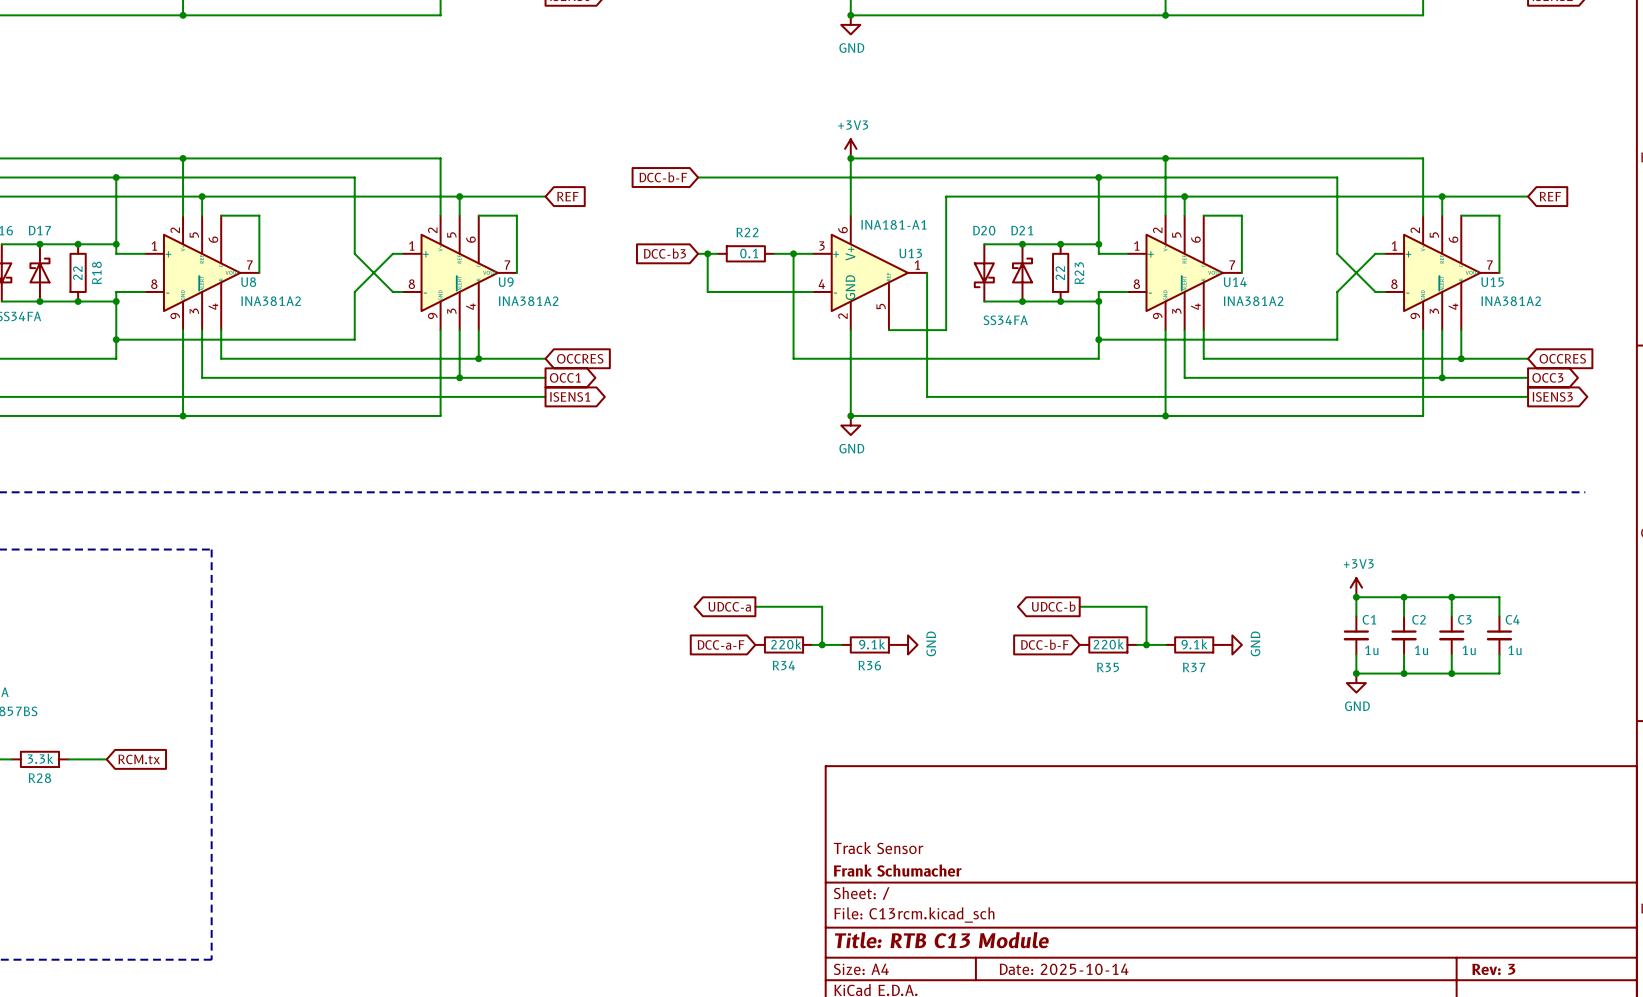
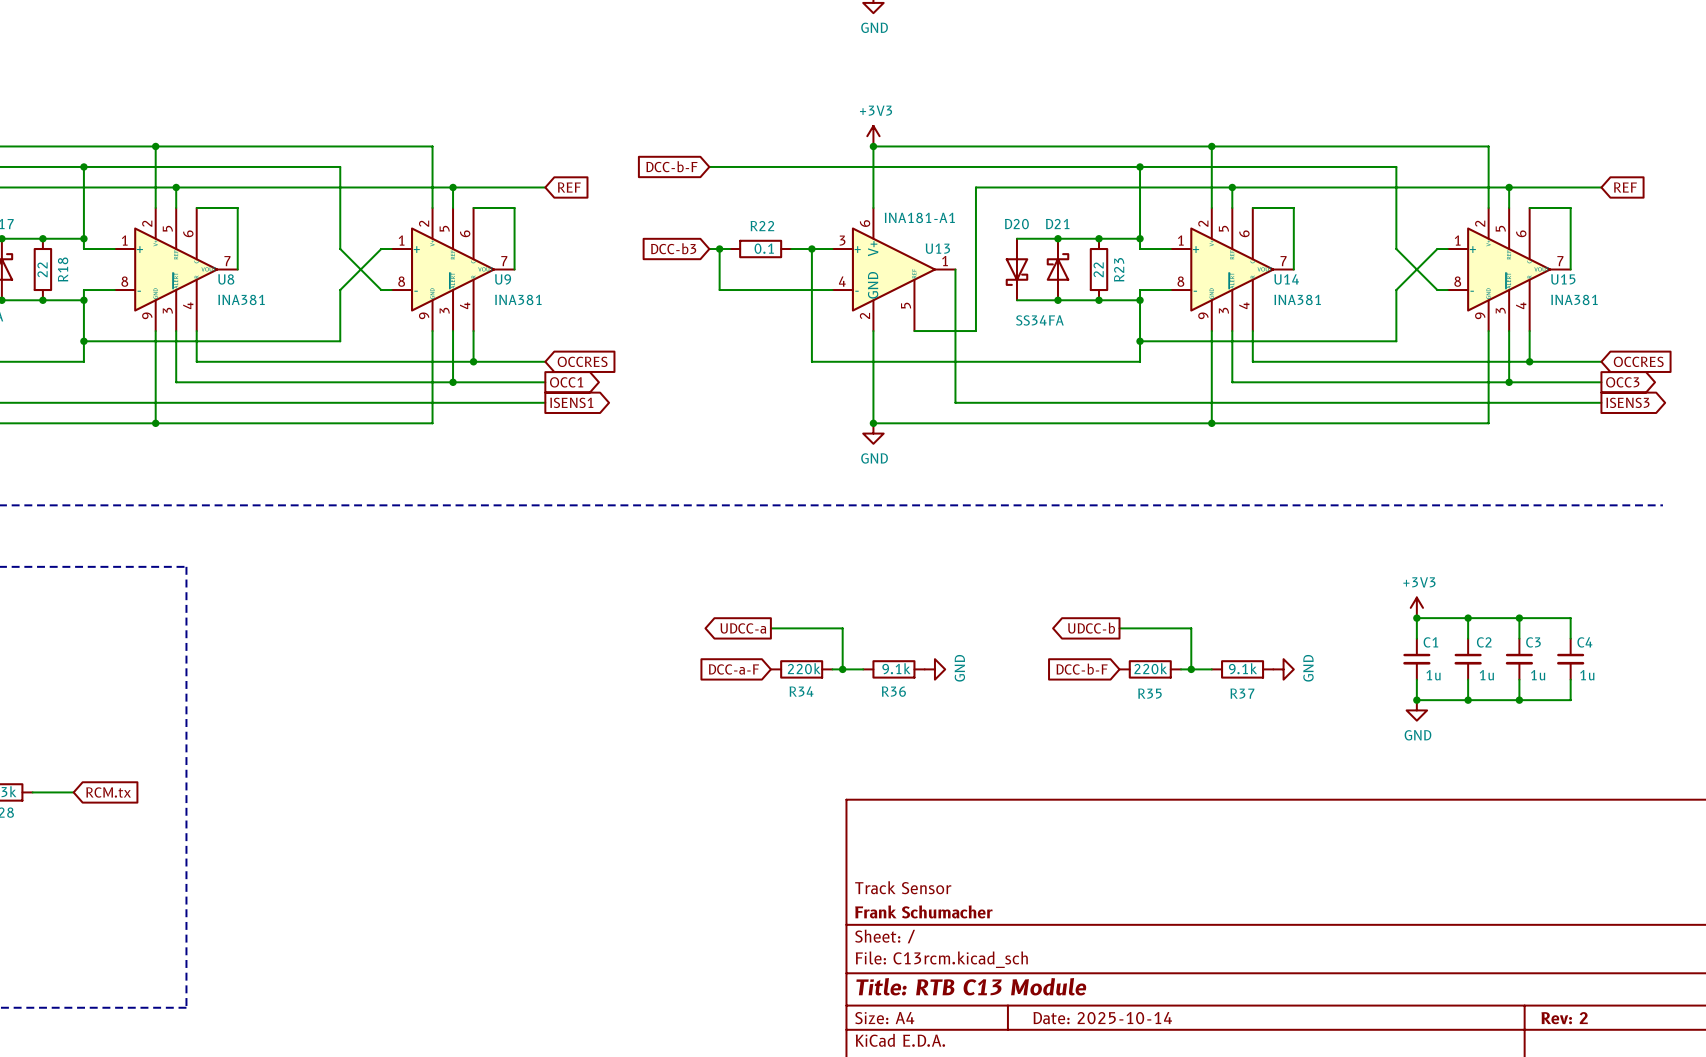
U8 value: INA381A2 (271, 301) -> INA381 (241, 299)
U9 value: INA381A2 (528, 301) -> INA381 (518, 299)
U14 value: INA381A2 (1253, 301) -> INA381 (1297, 299)
U15 value: INA381A2 (1511, 301) -> INA381 (1574, 299)
title block: Rev: 3 (1493, 969) -> Rev: 2 (1564, 1018)

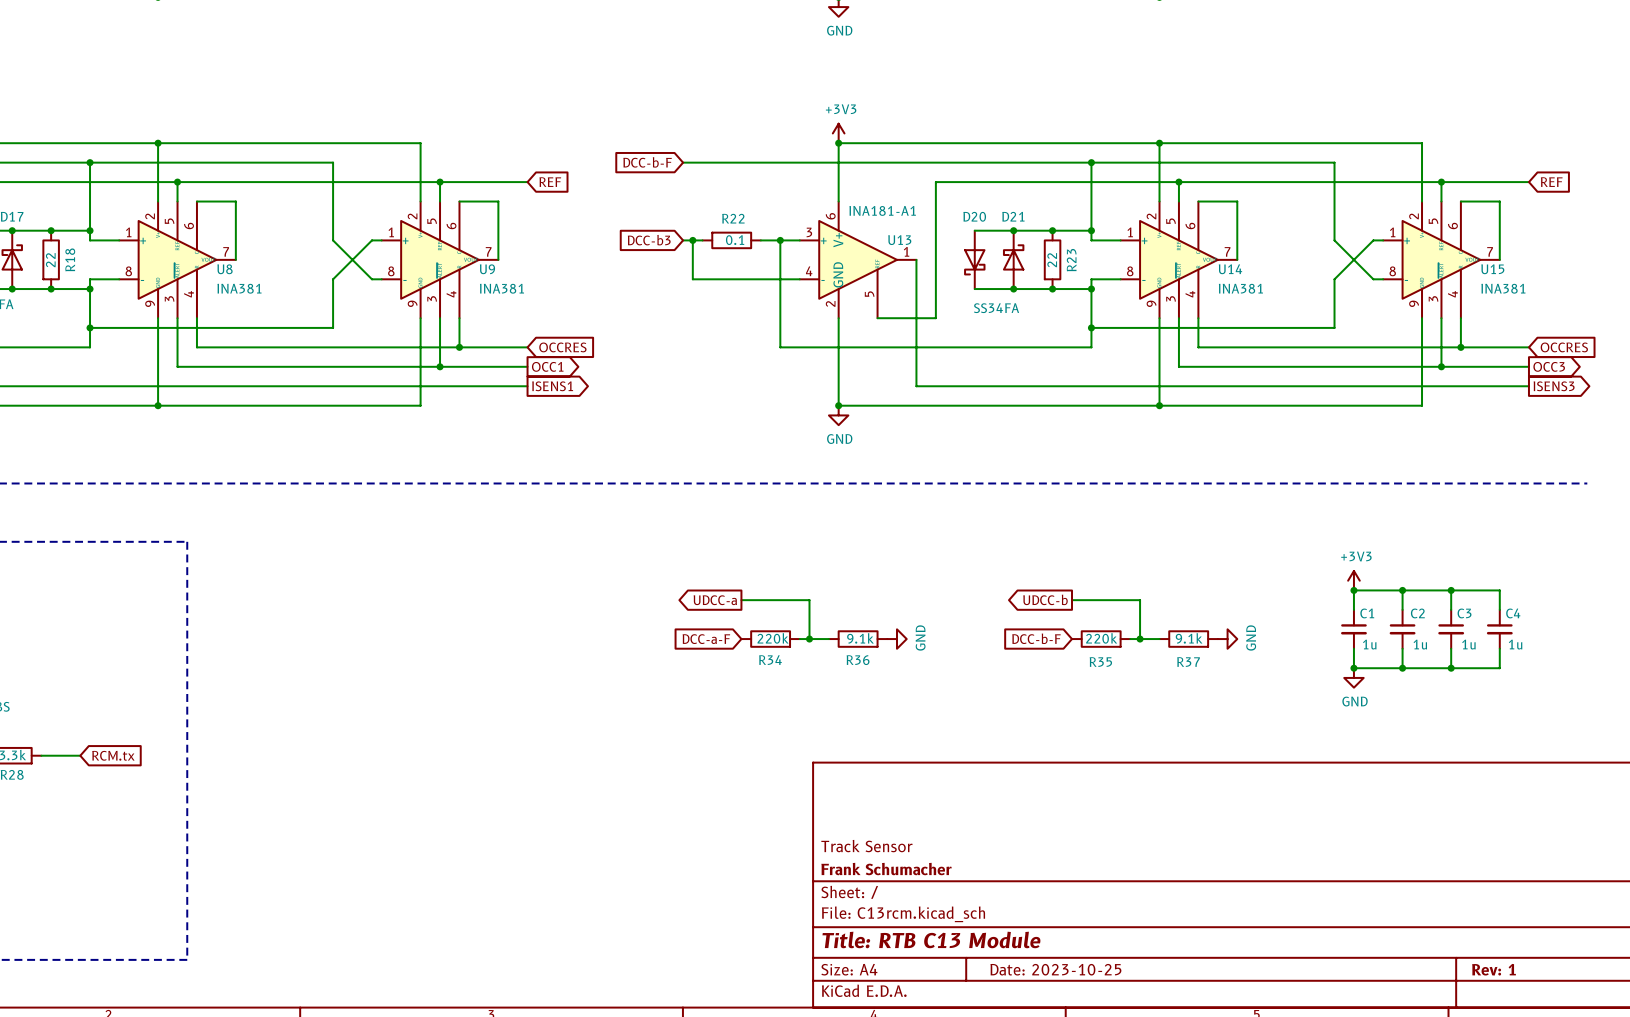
title block: Date: 2025-10-14 (1102, 1018) -> Date: 2023-10-25 (1055, 969)
title block: Rev: 2 (1564, 1018) -> Rev: 1 (1493, 969)

